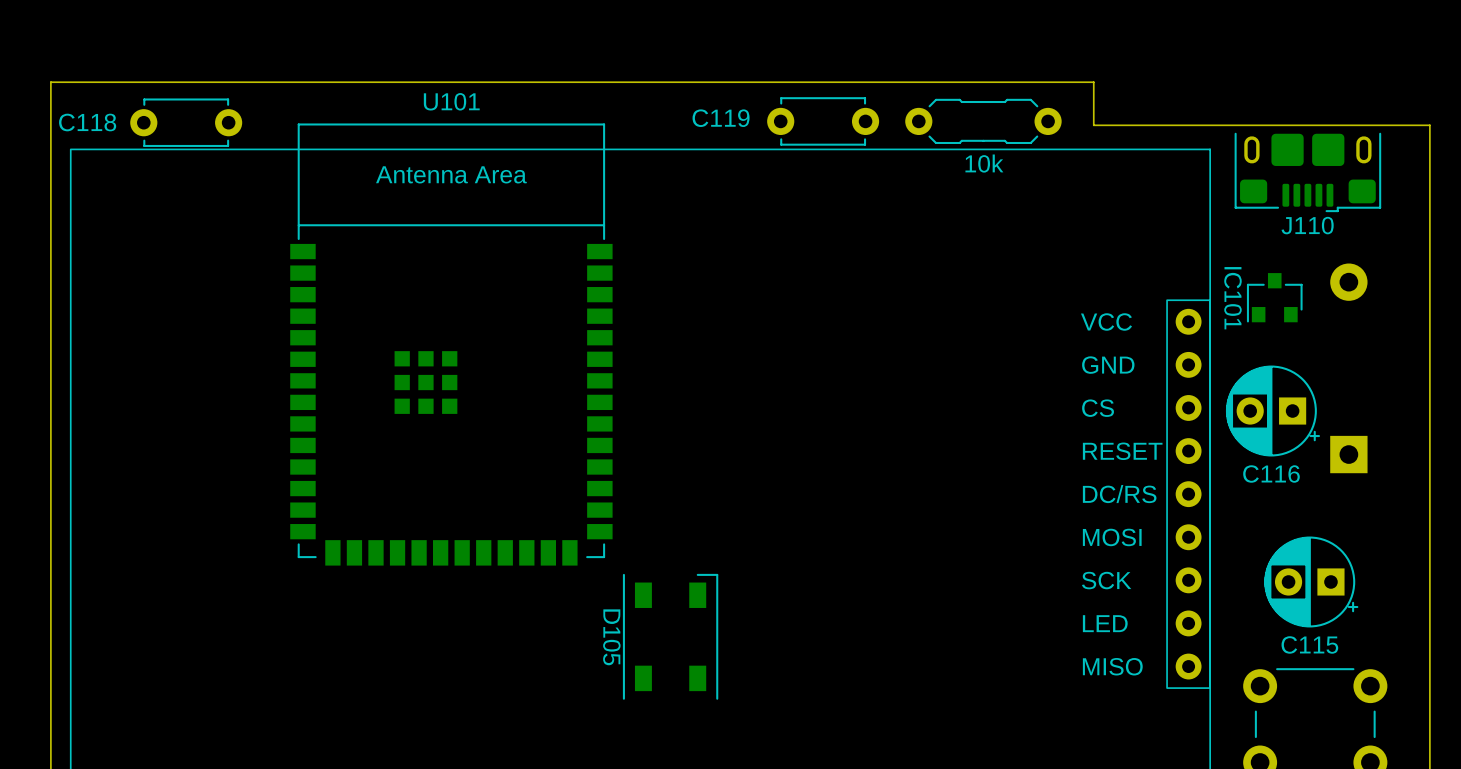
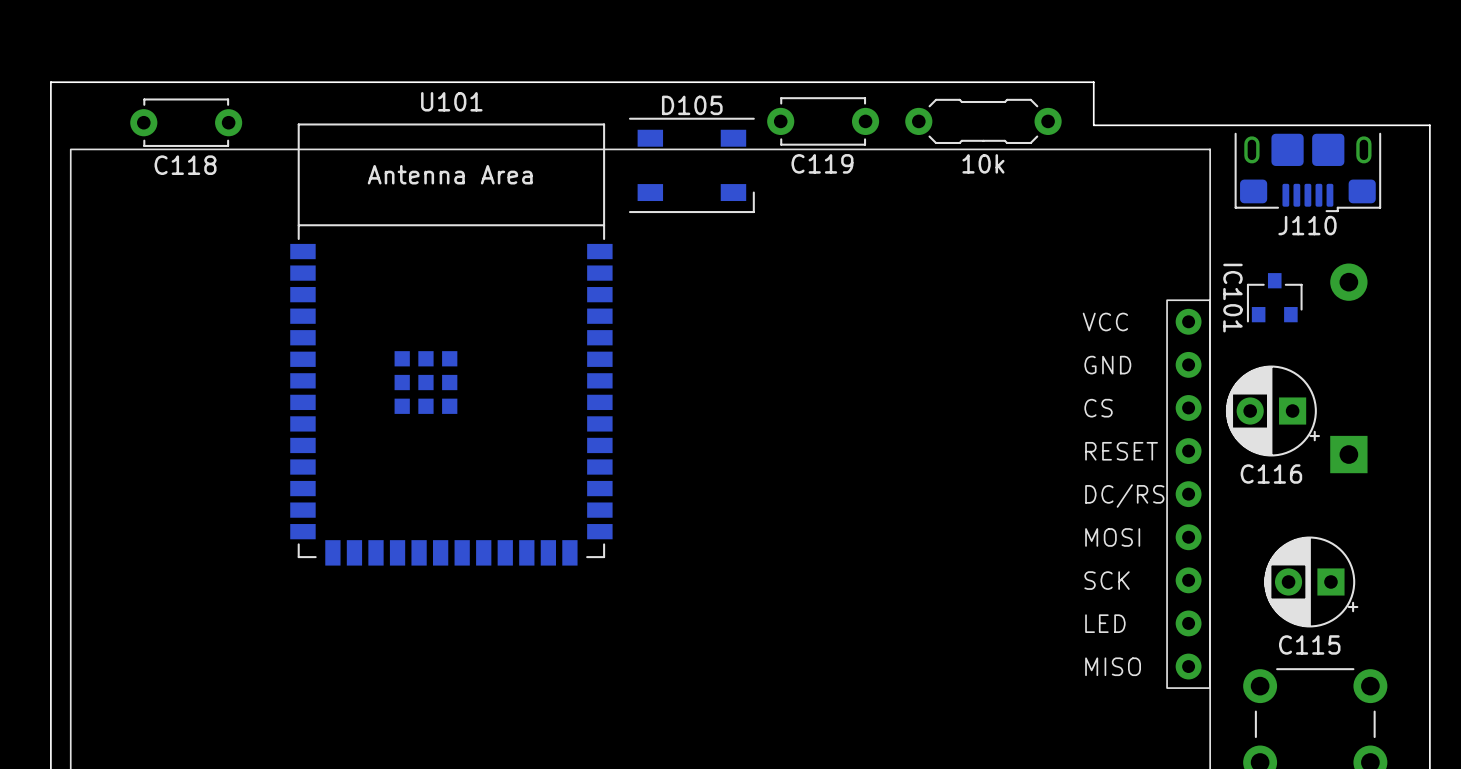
C119 name position: C119 (721, 118) -> C119 (822, 163)
C118 name position: C118 (87, 122) -> C118 (185, 165)
D105 rotation: 0° (670, 636) -> 90° clockwise (691, 165)
D105 position: (670, 636) -> (691, 165)

